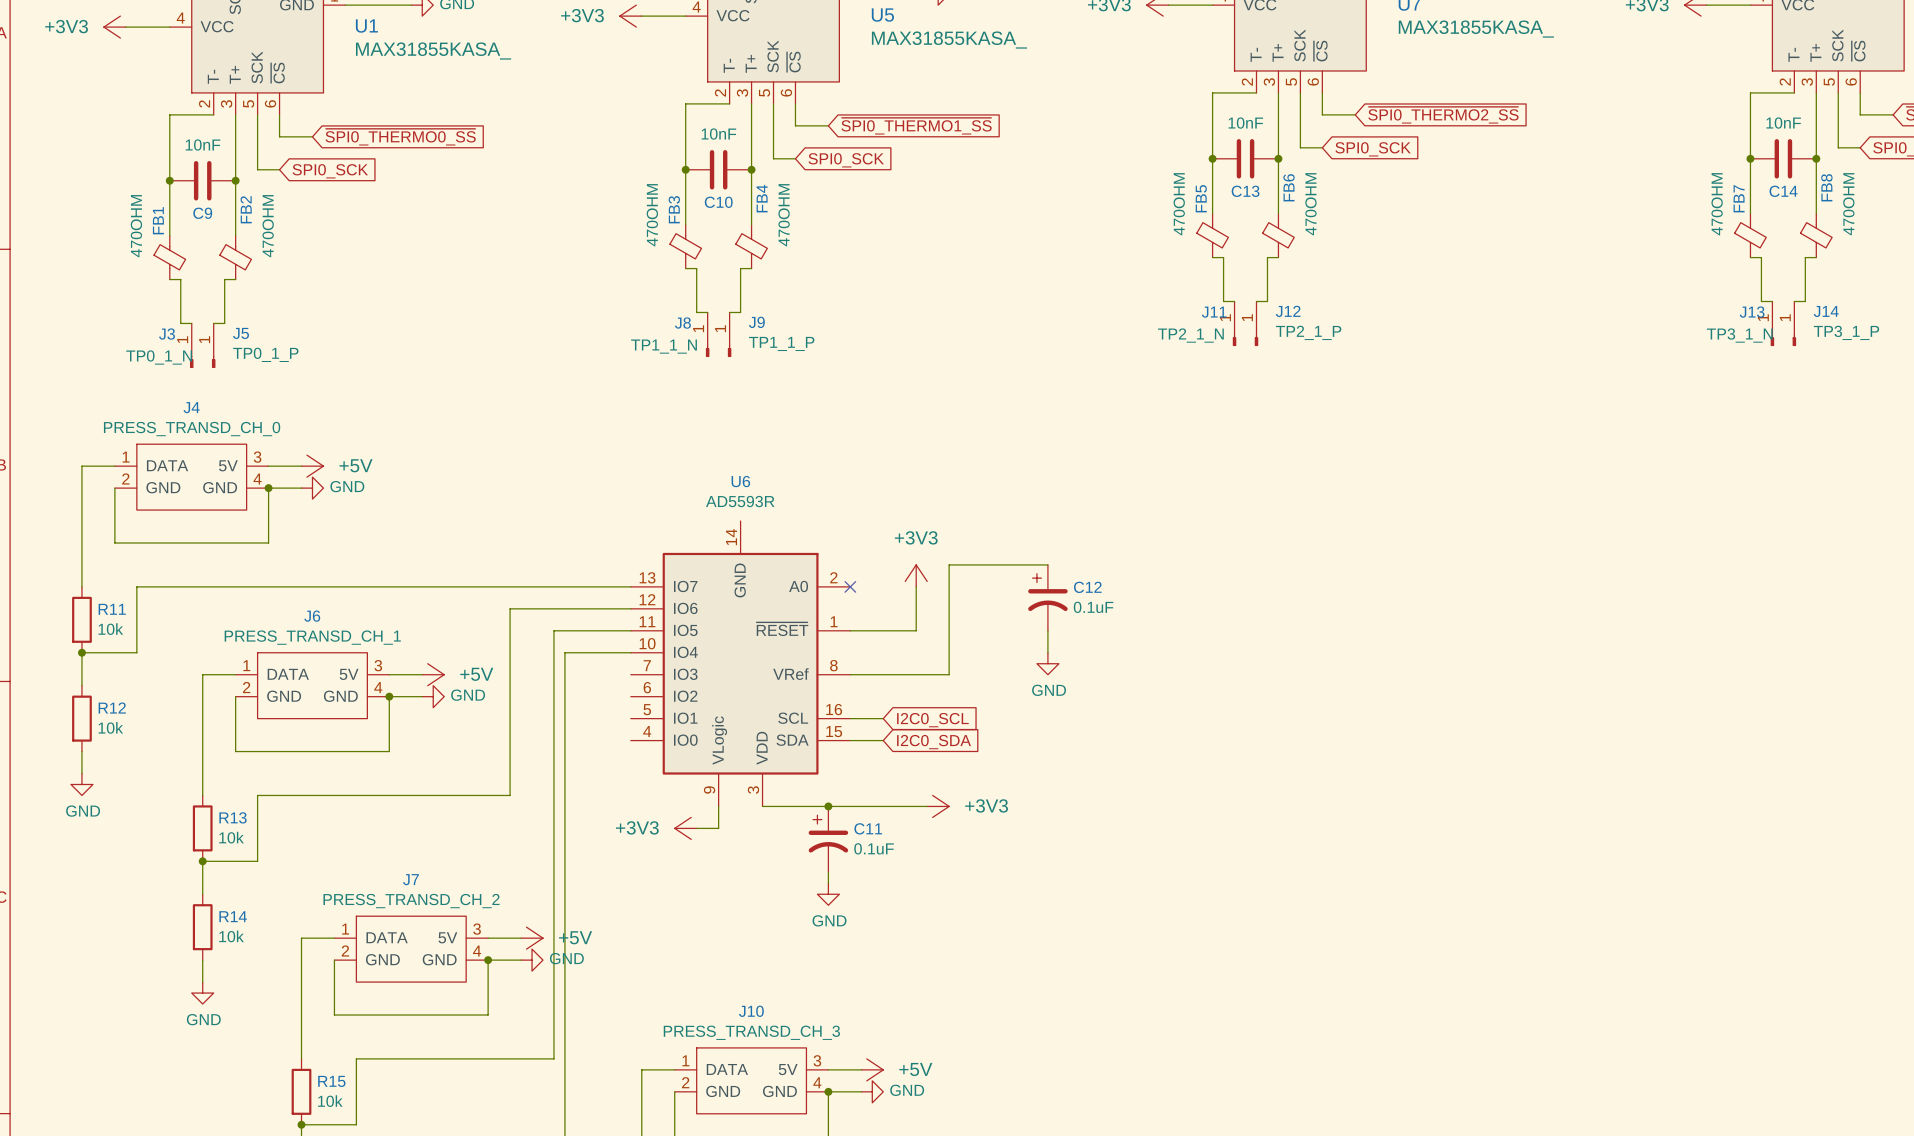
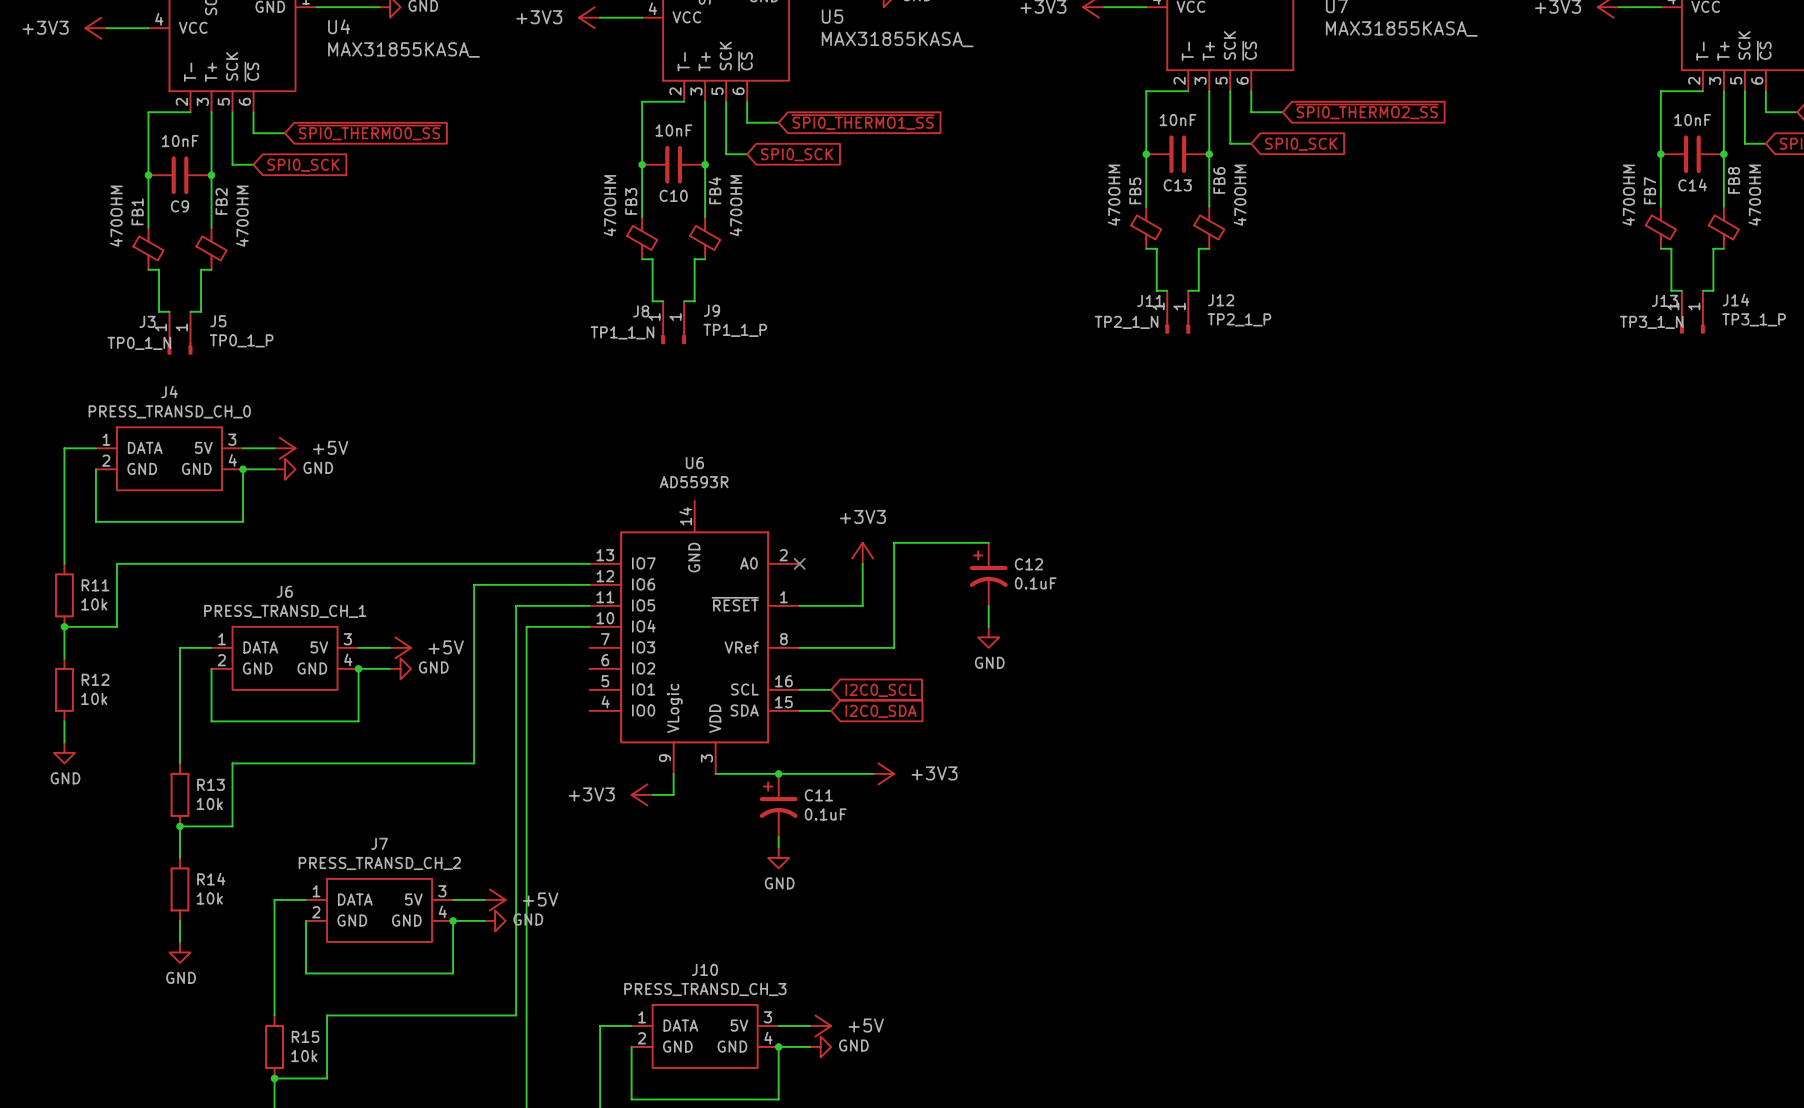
U1 name: U1 (366, 26) -> U4 (339, 26)

